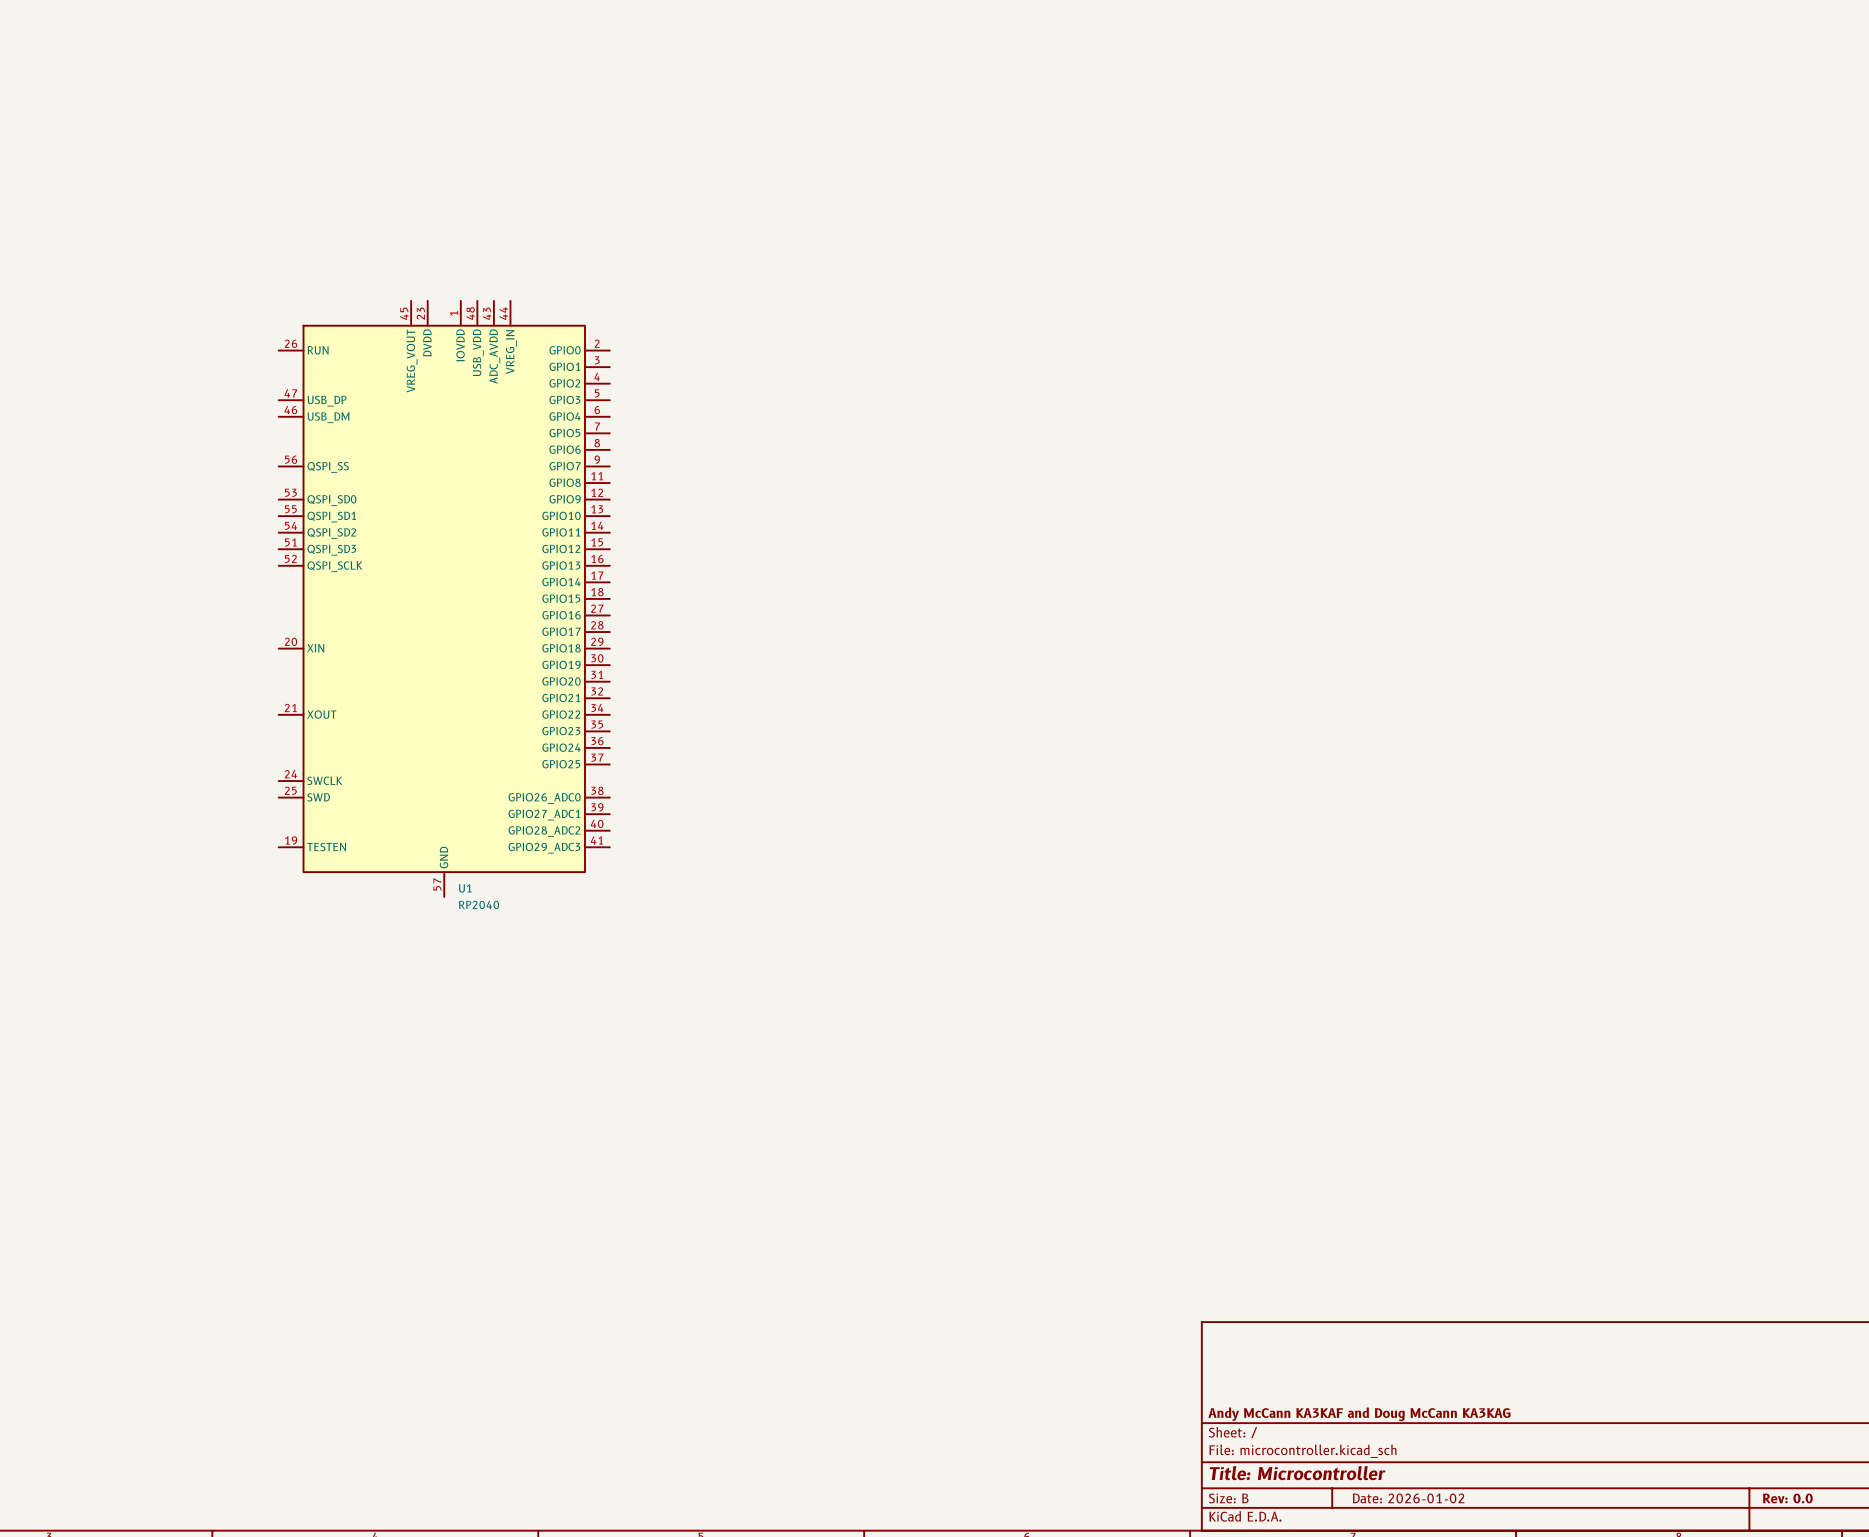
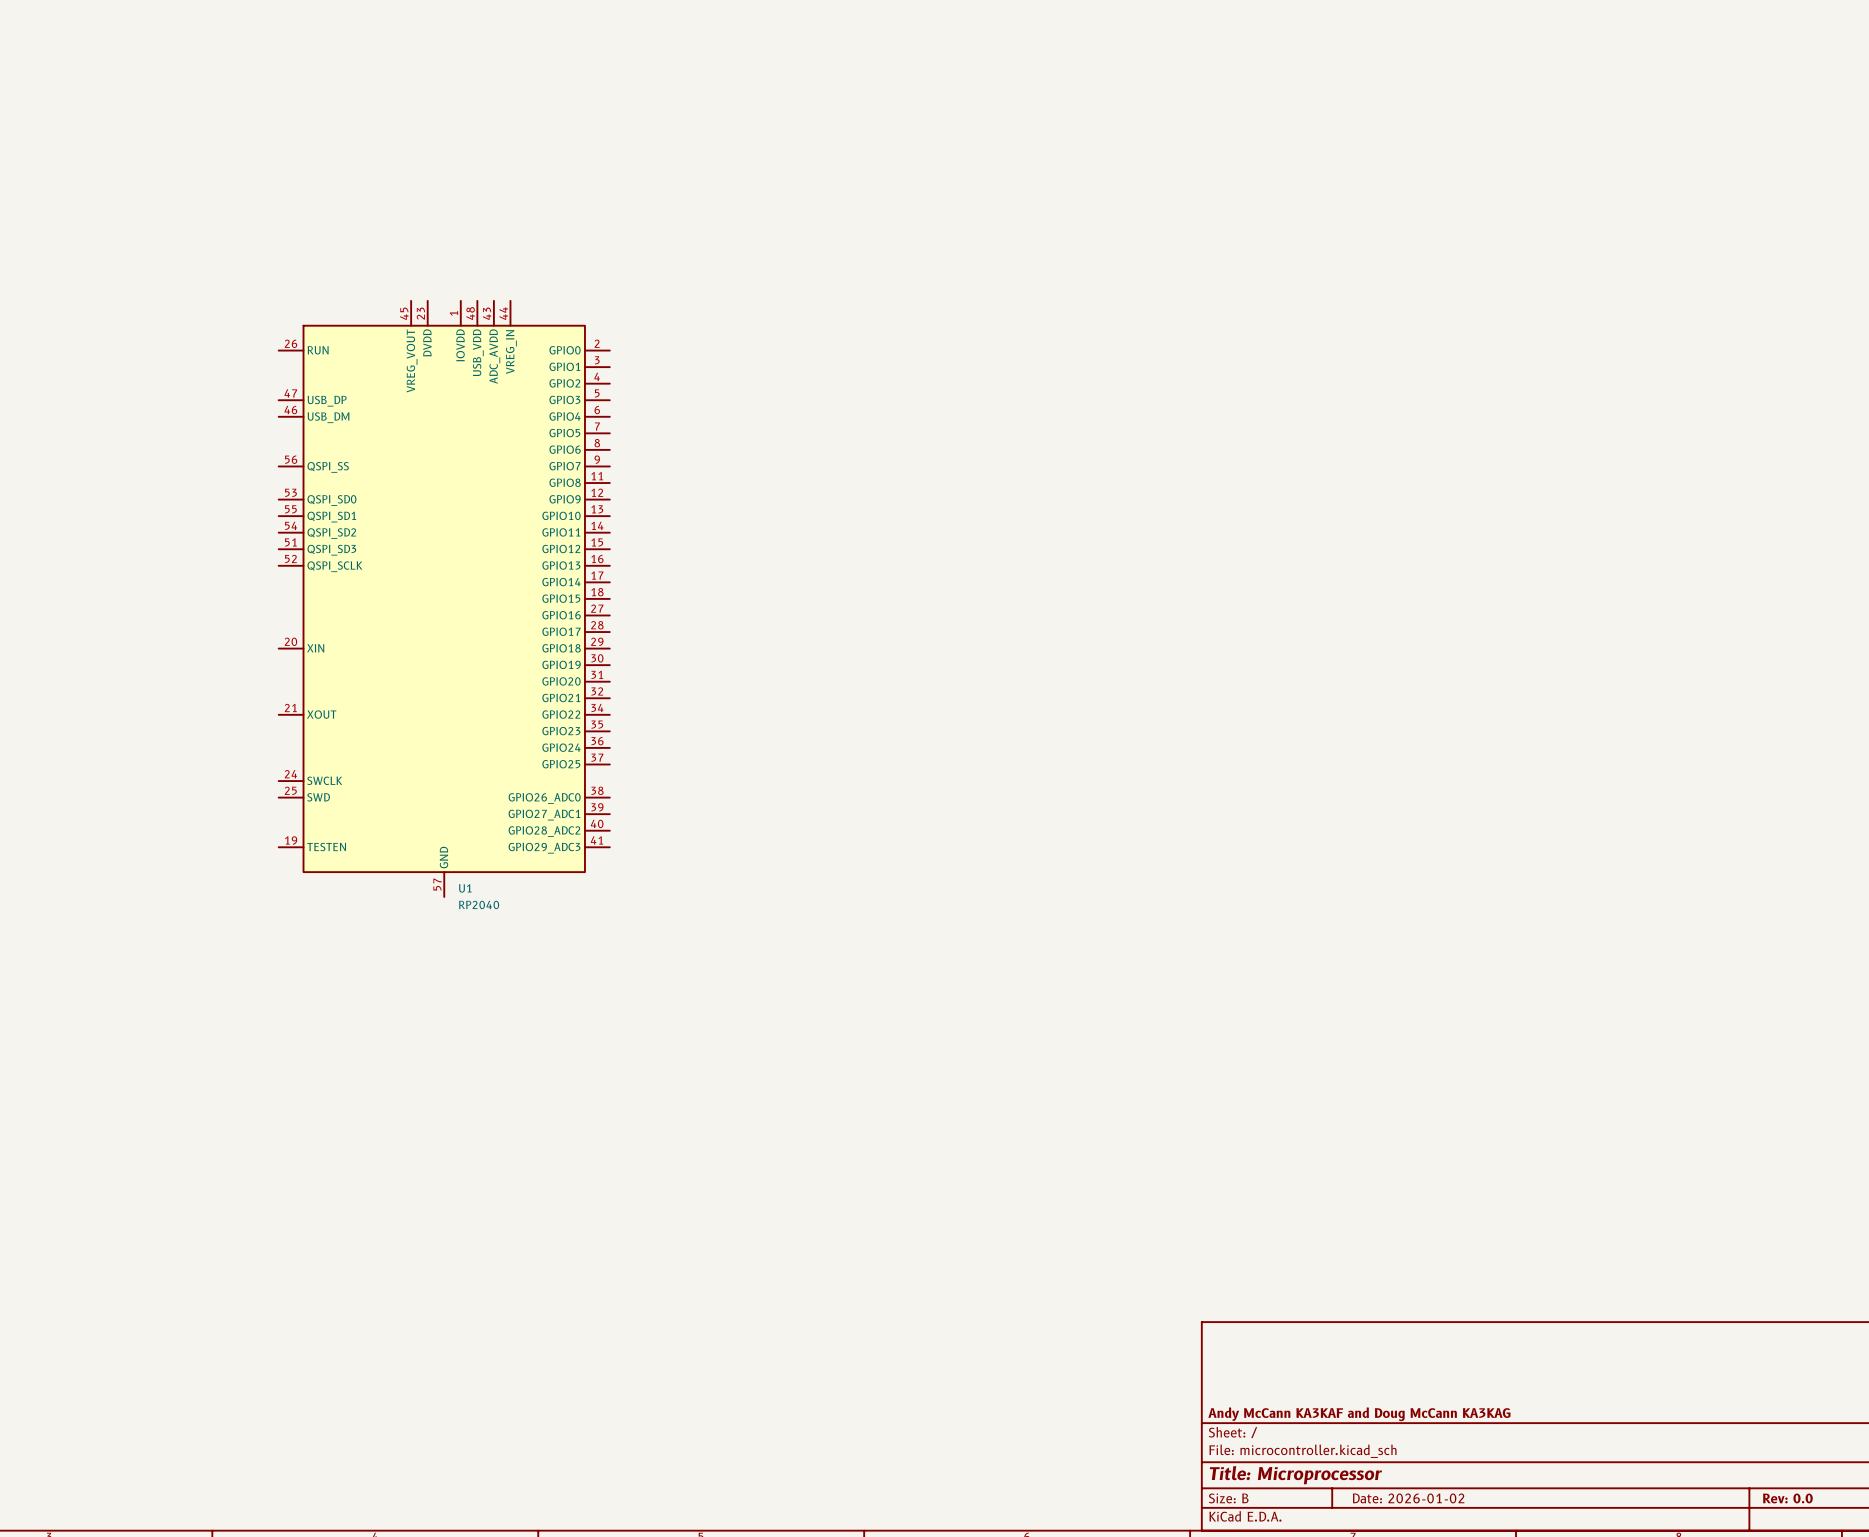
title block: Title: Microcontroller (1297, 1473) -> Title: Microprocessor (1295, 1475)

